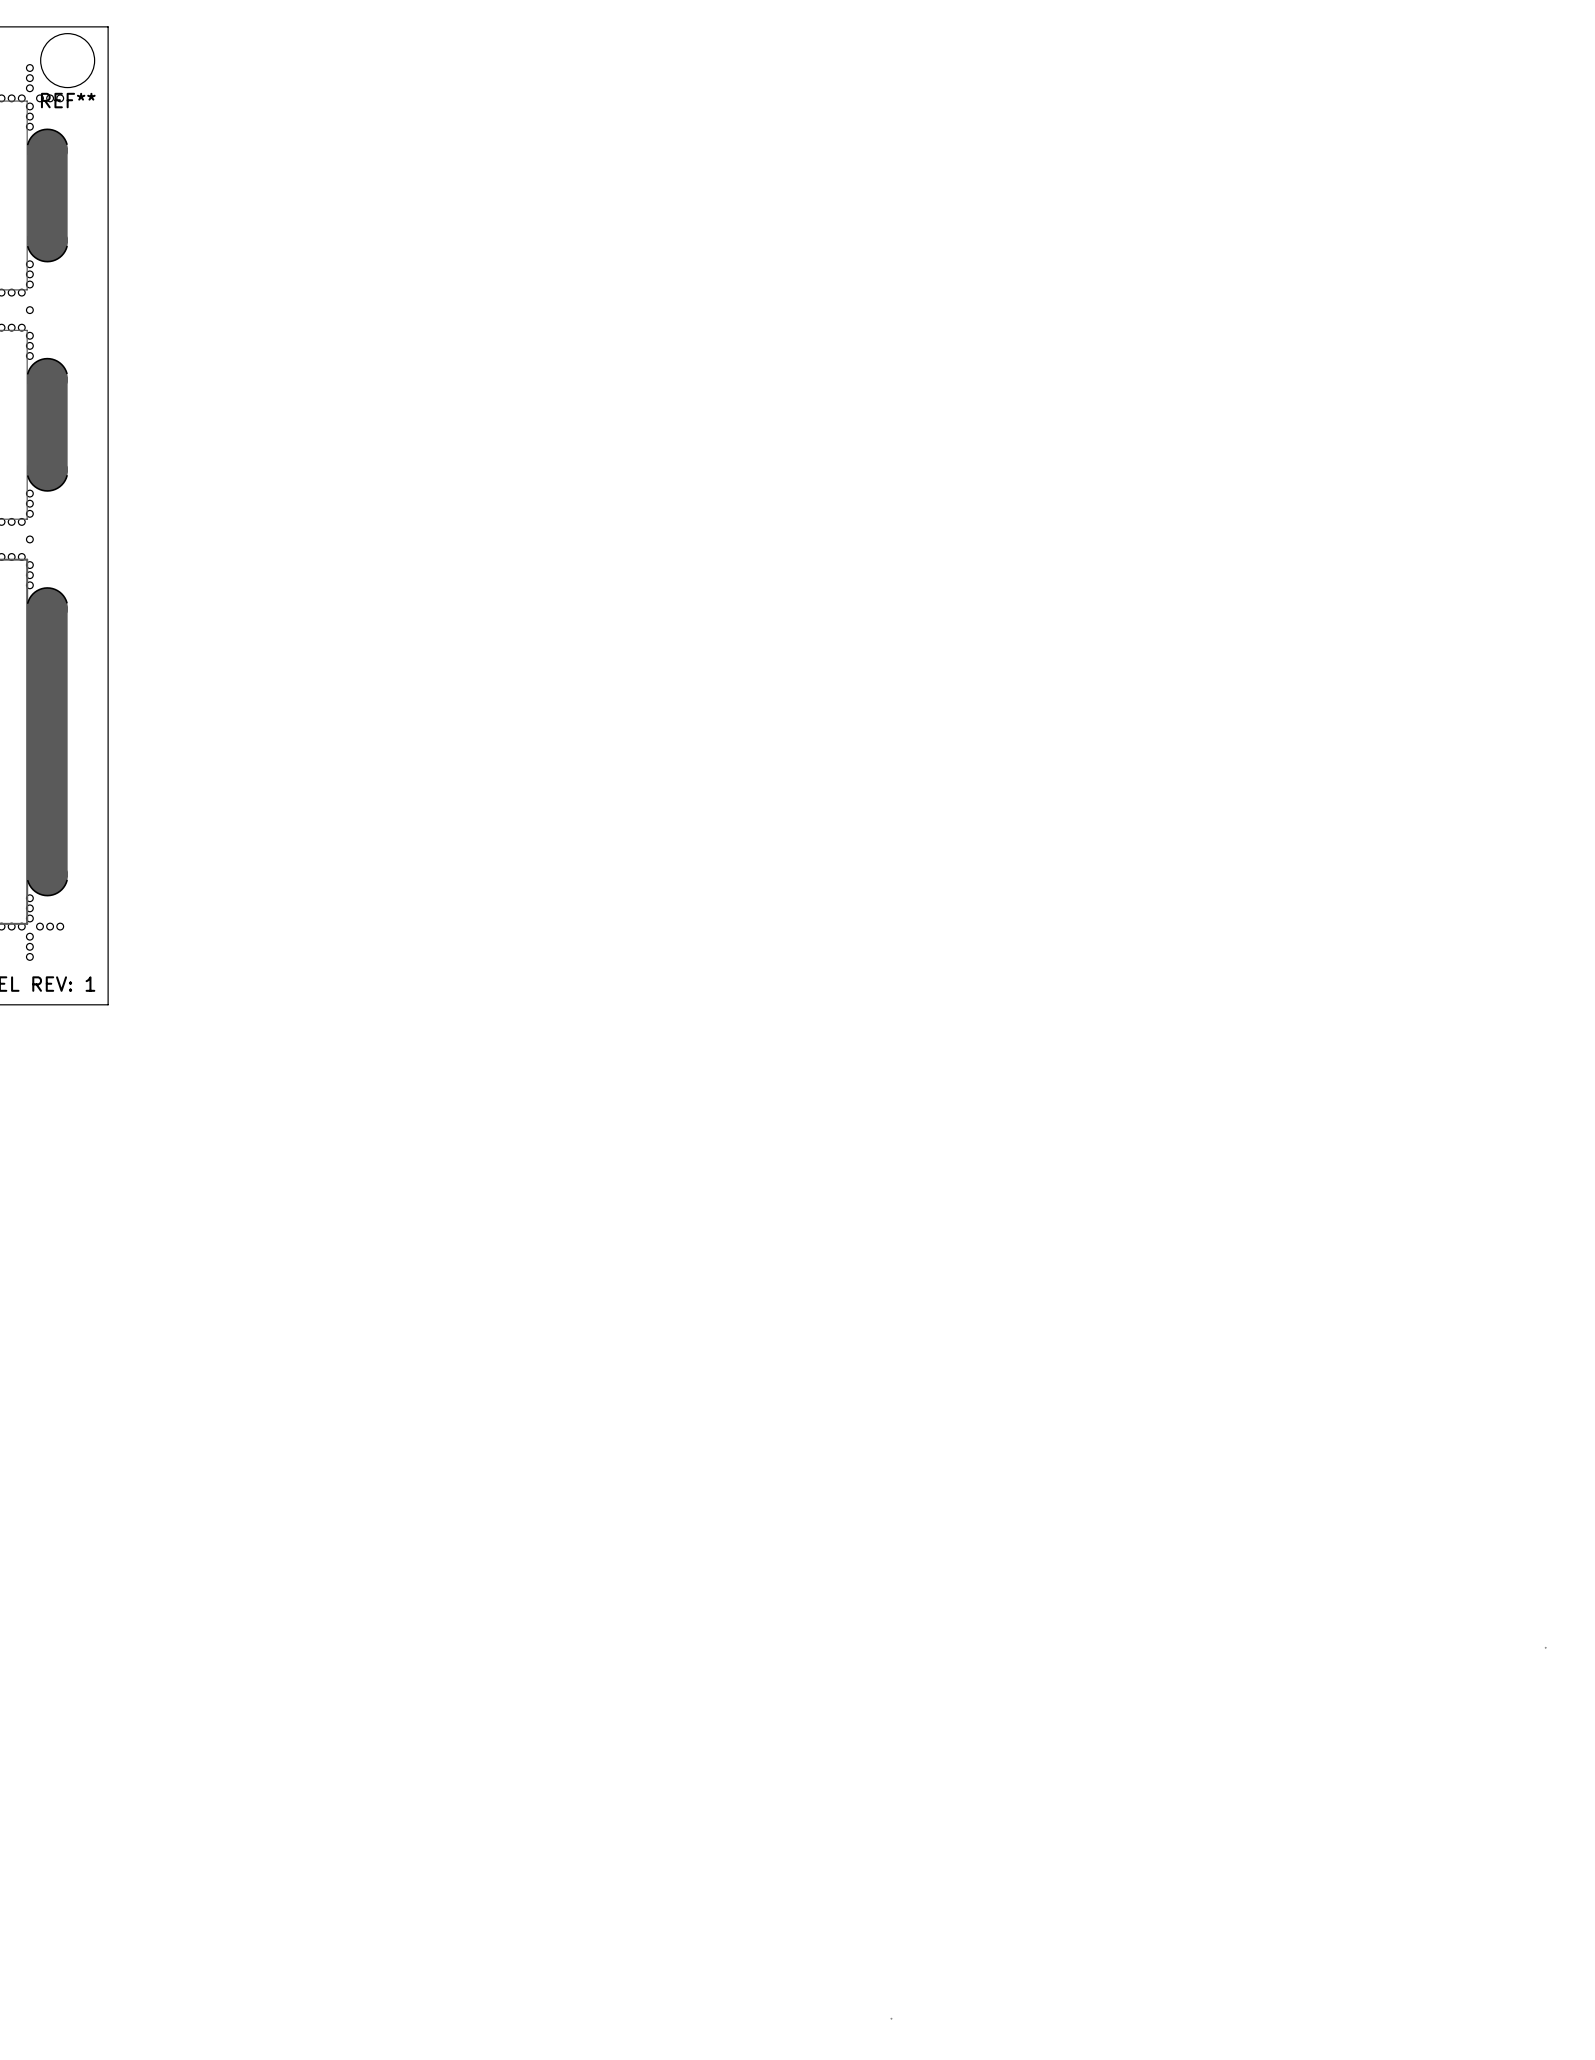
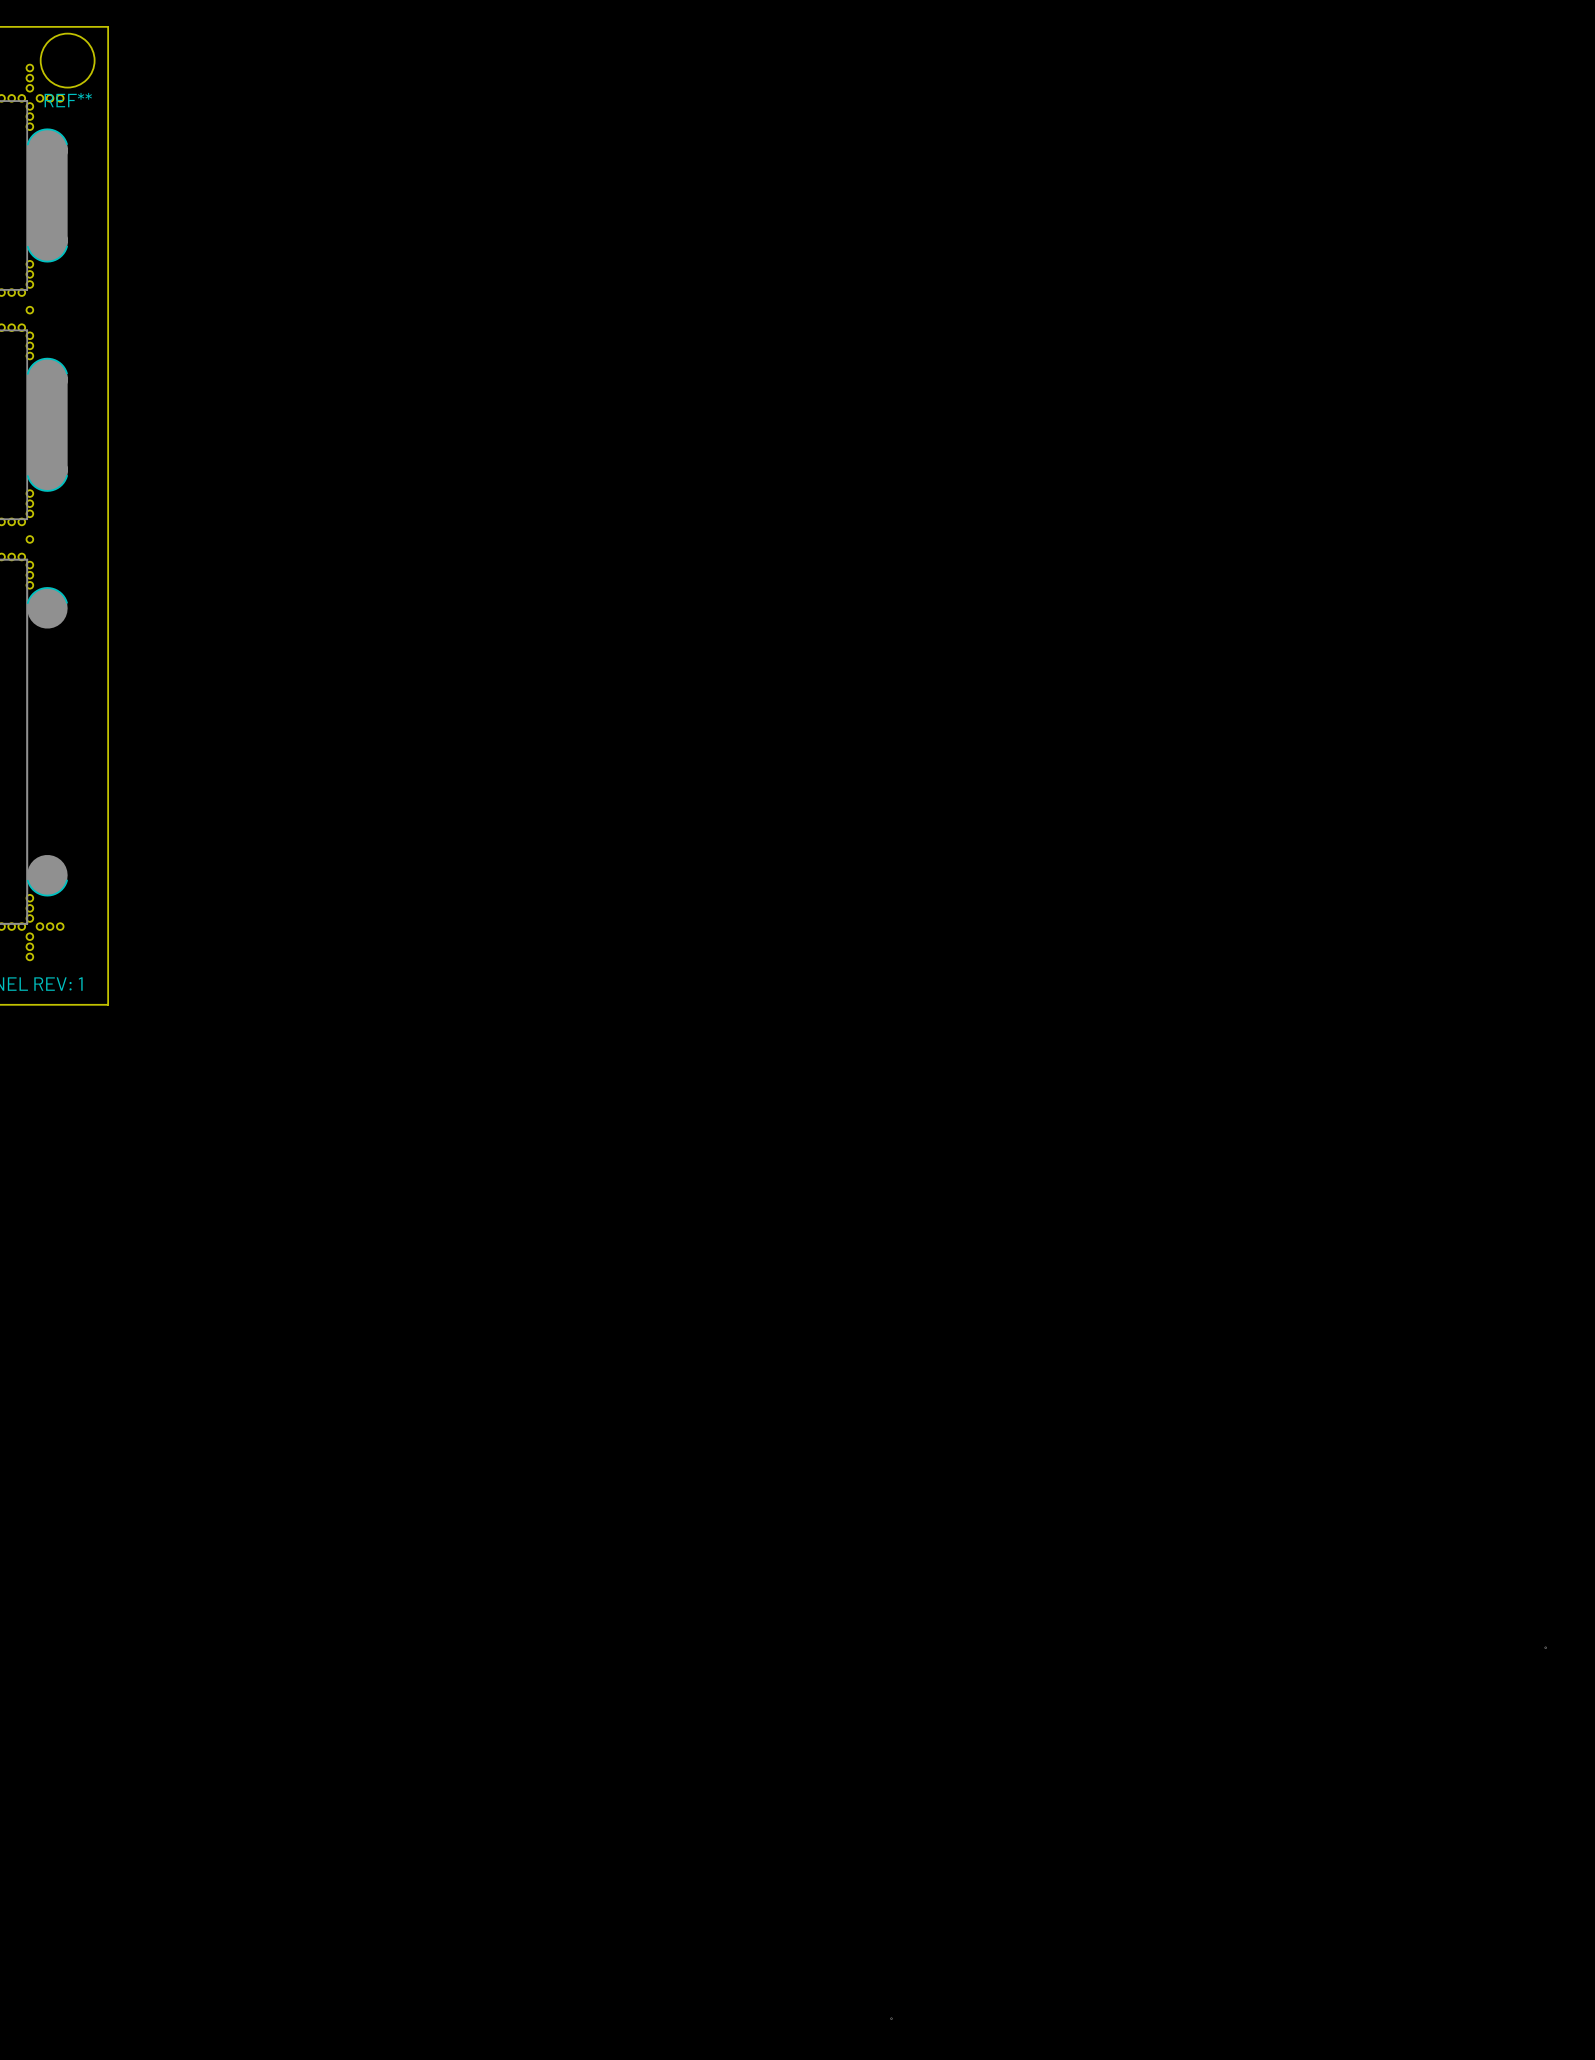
line: (47, 608) (47, 875) -> none

